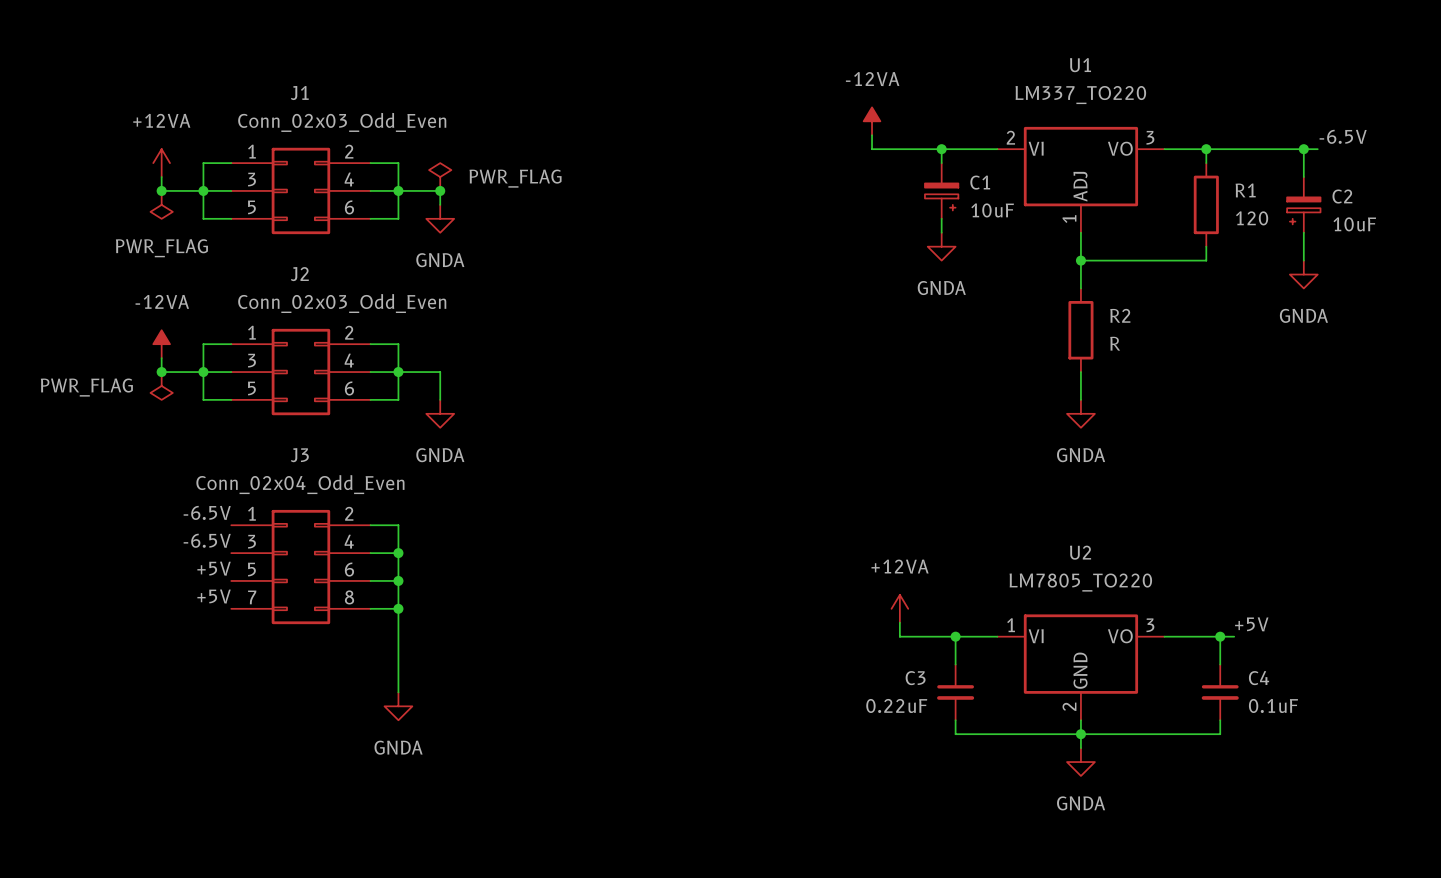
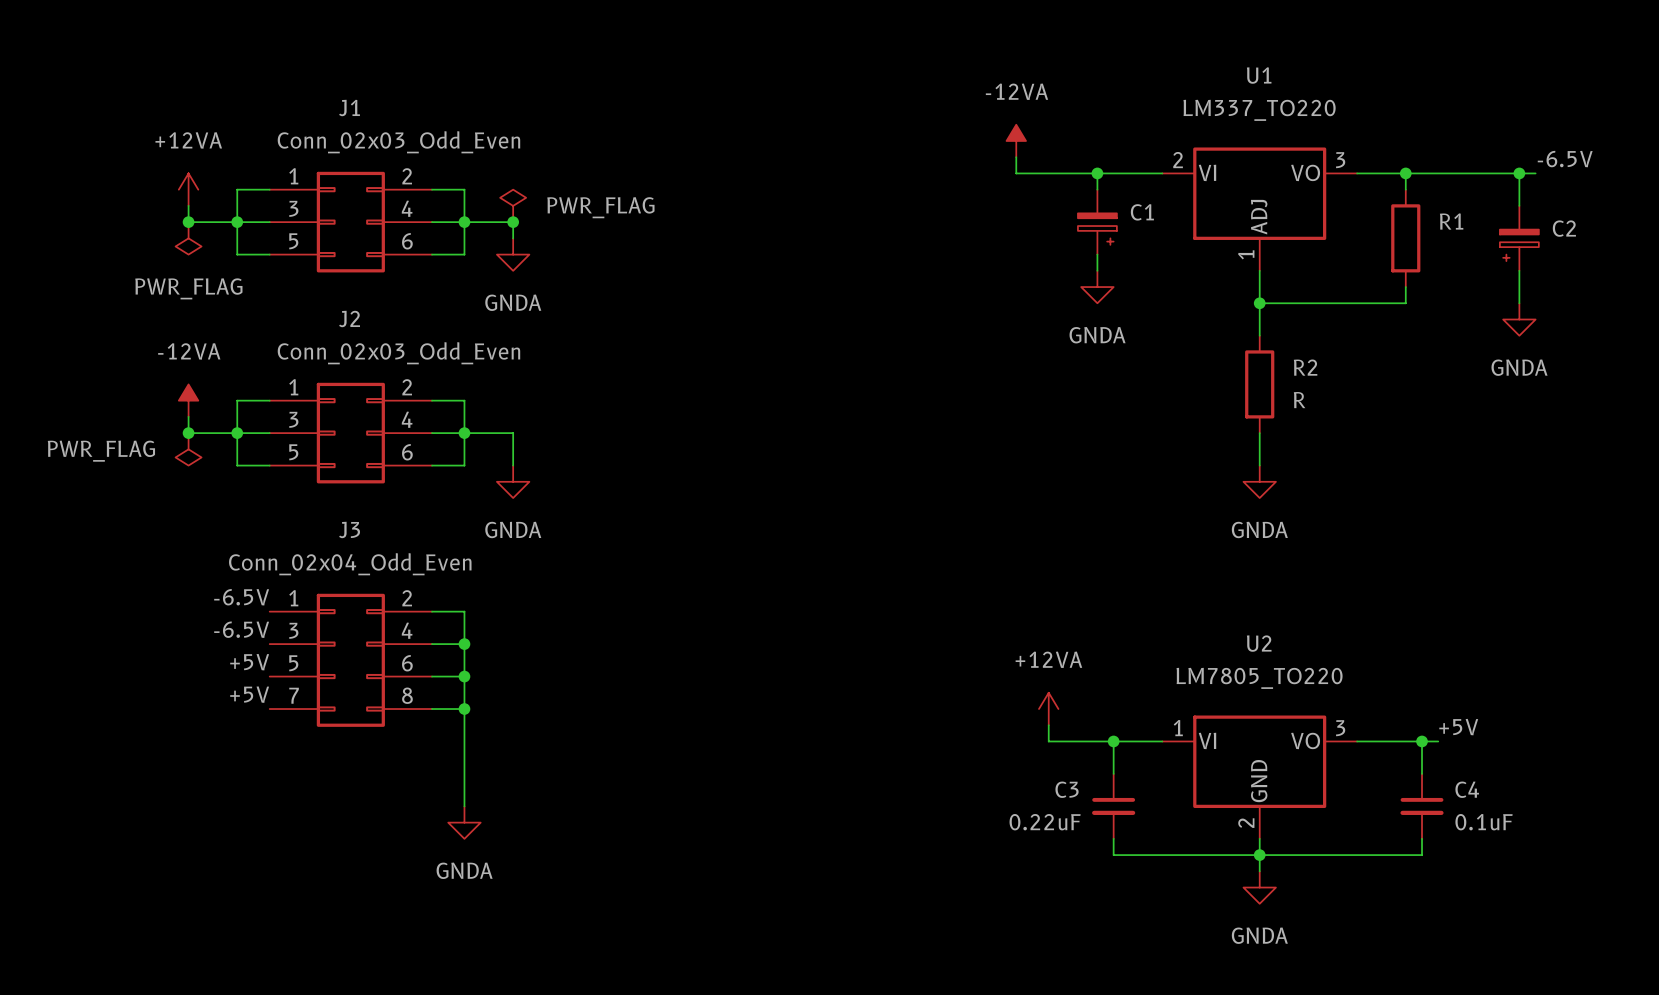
C1 value: 10uF (992, 210) -> none
R1 value: 120 (1252, 218) -> none
C2 value: 10uF (1354, 224) -> none

